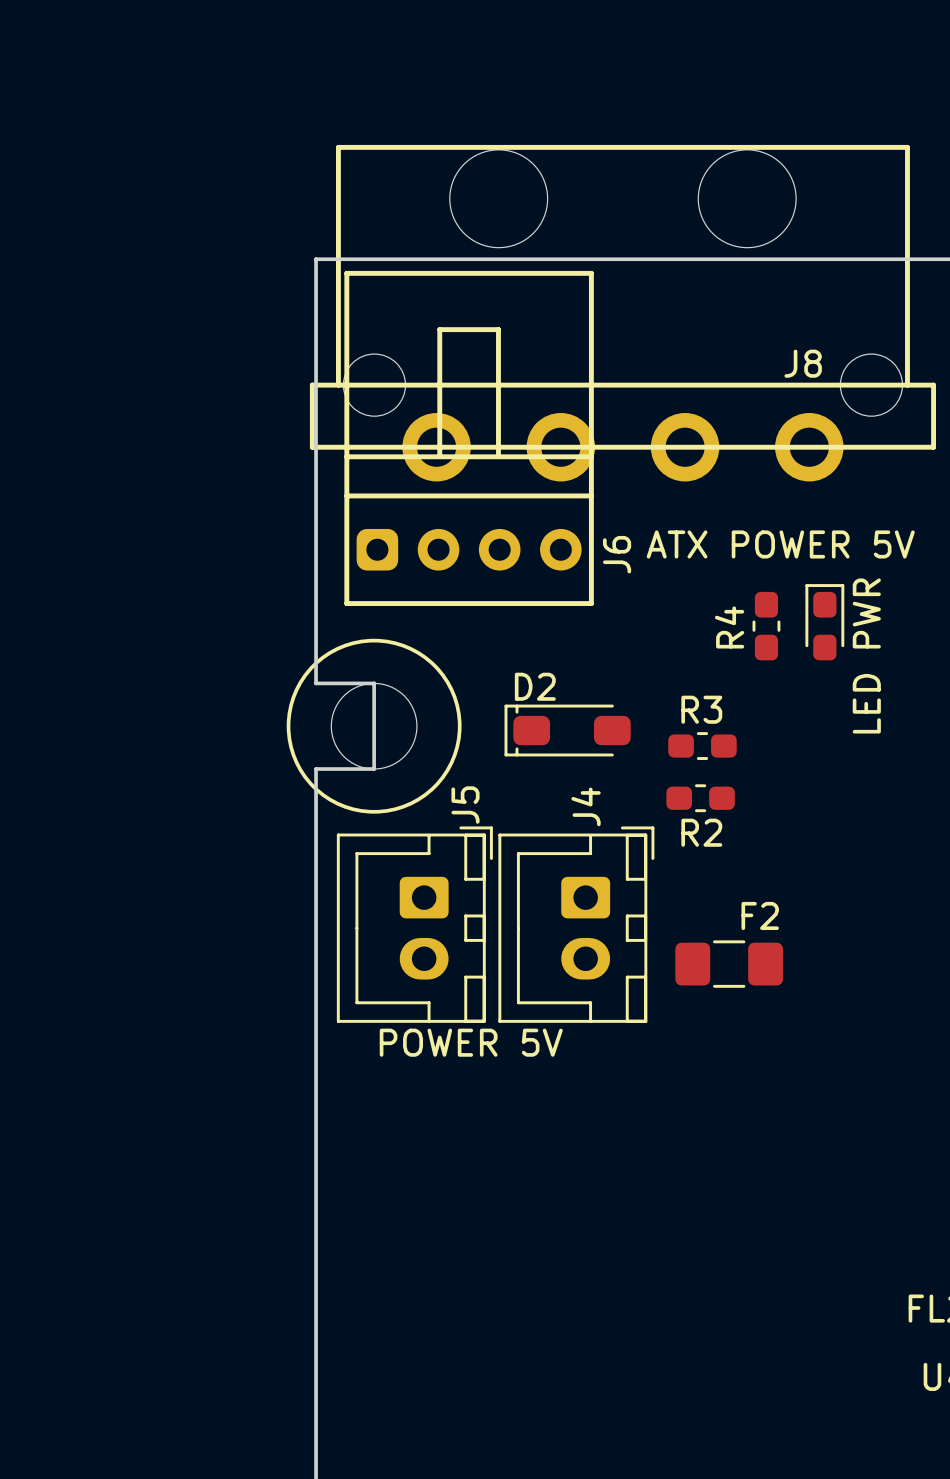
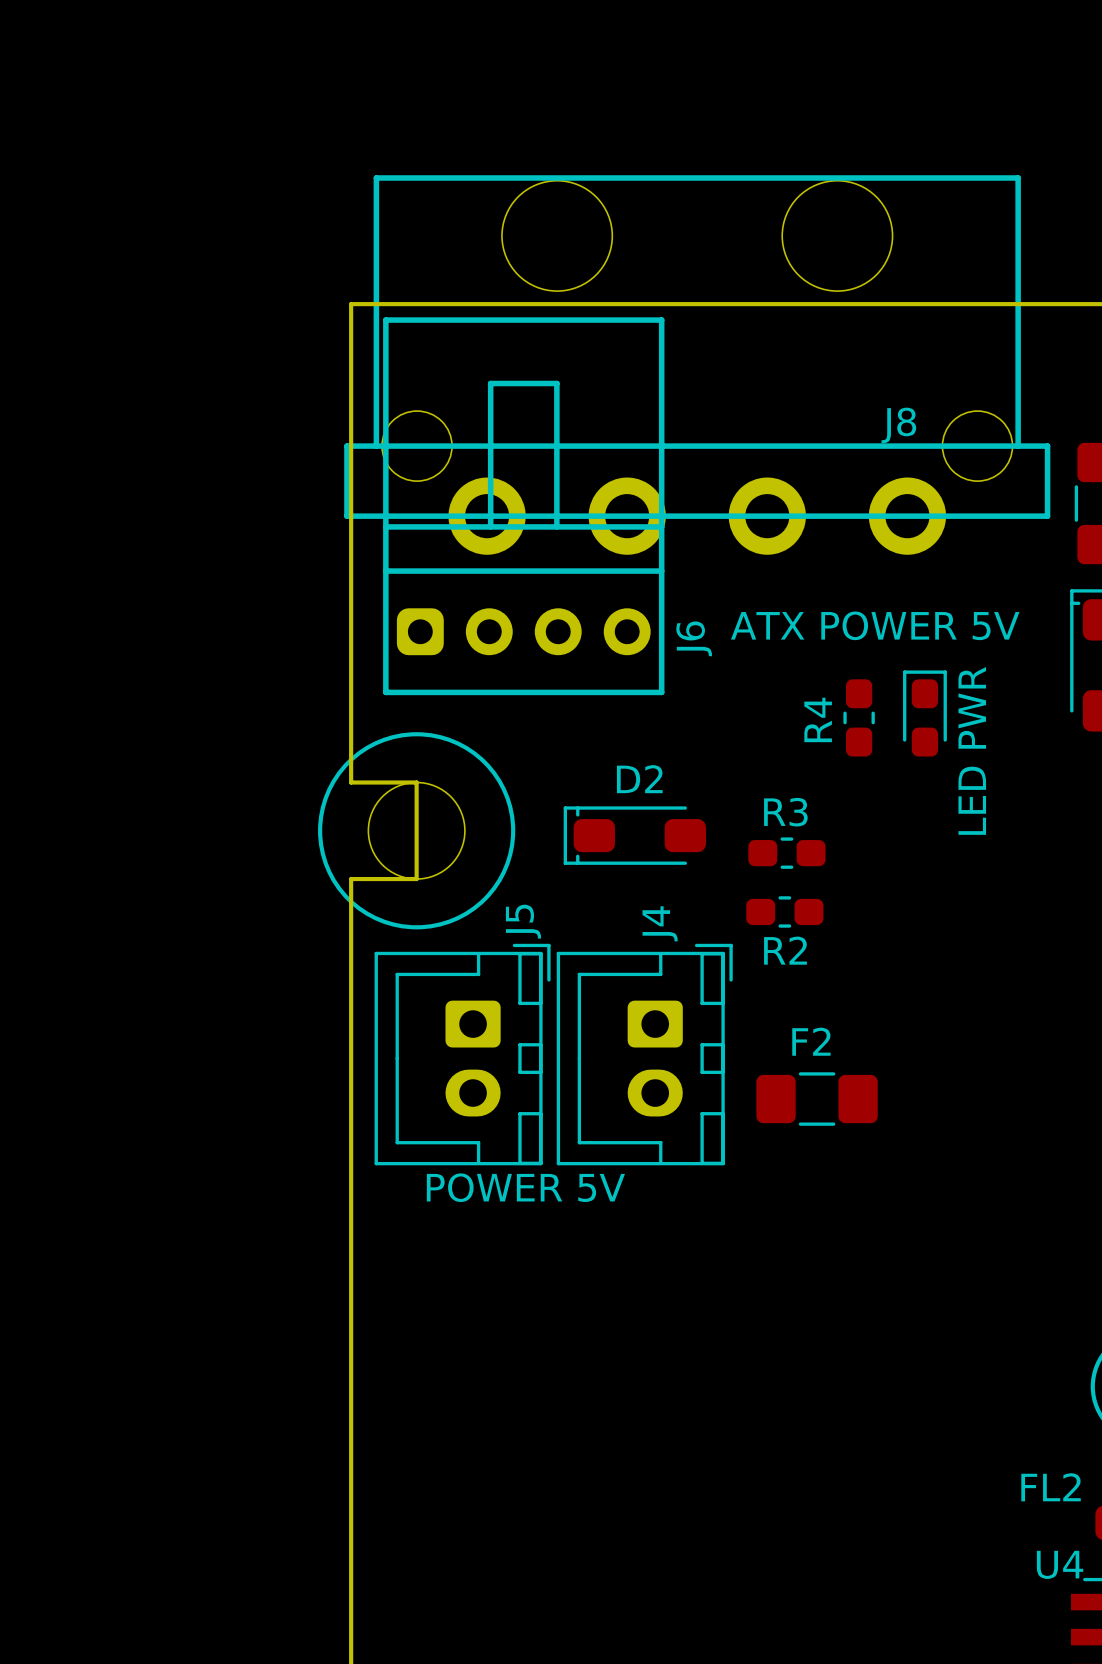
D2 name position: D2 (535, 686) -> D2 (639, 779)
F2 name position: F2 (760, 915) -> F2 (811, 1041)

